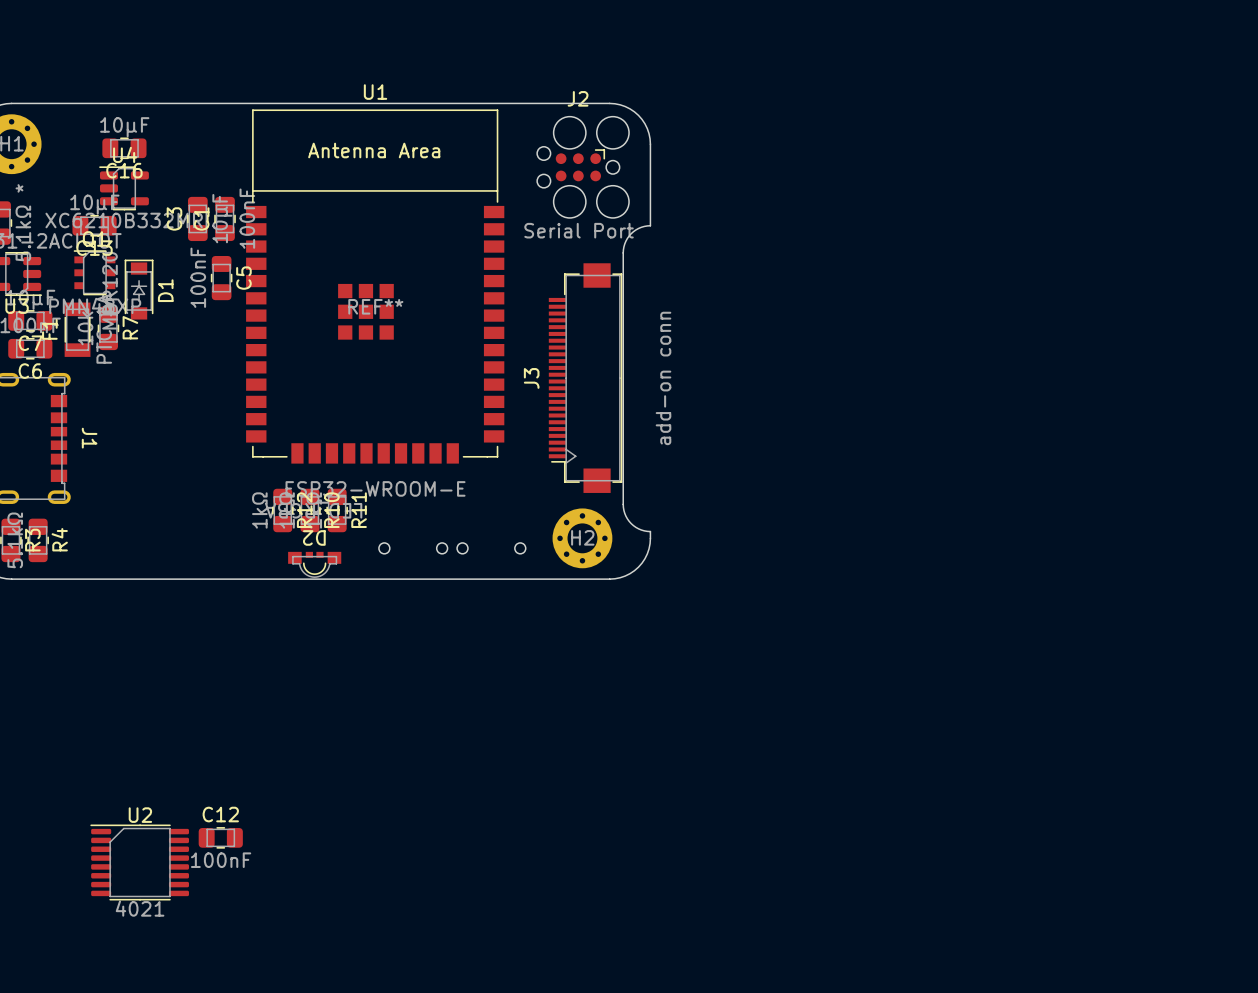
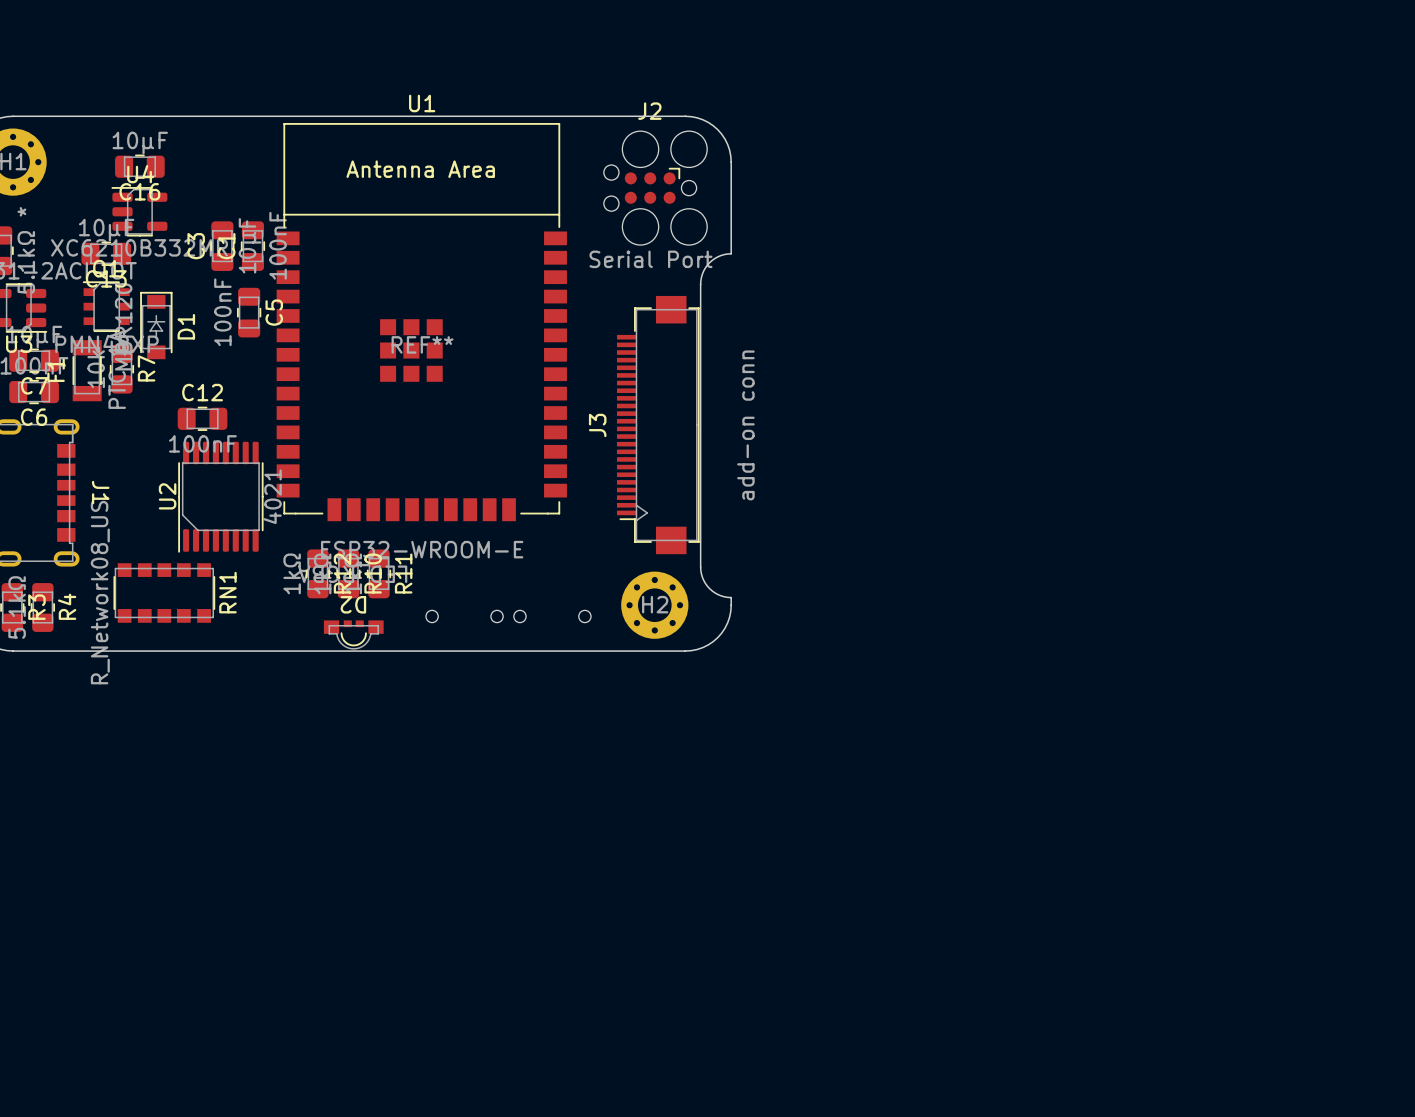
RN1: none -> R_Network08_US (164, 592)
C12 position: (220, 837) -> (202, 418)
U2 rotation: 0° (139, 862) -> 90° counterclockwise (220, 497)
U2 position: (139, 862) -> (220, 497)

